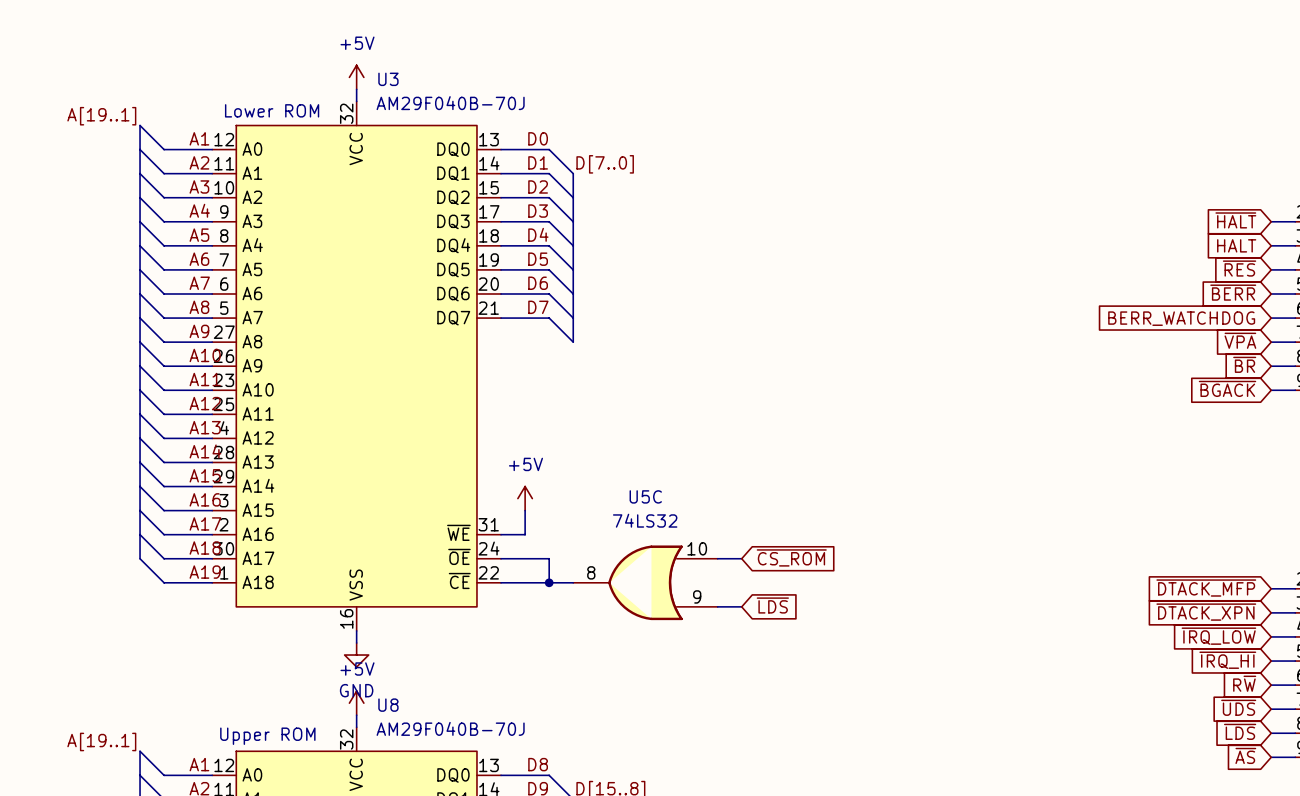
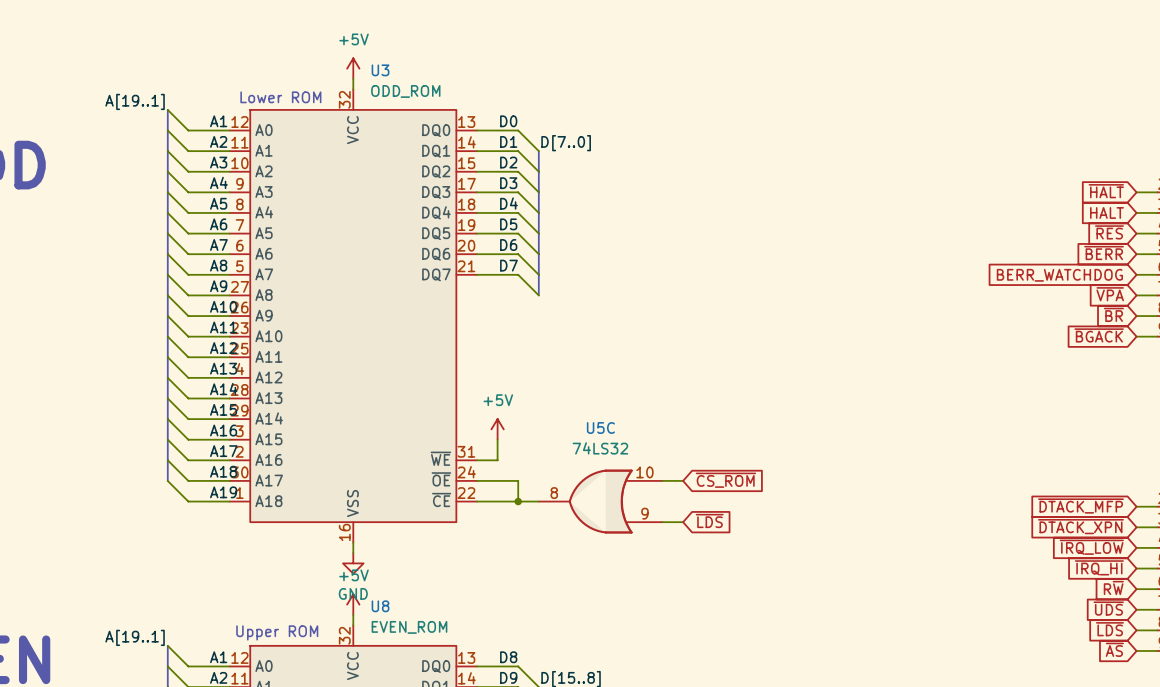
U3 value: AM29F040B-70J (450, 103) -> ODD_ROM (405, 91)
U8 value: AM29F040B-70J (450, 728) -> EVEN_ROM (409, 627)

